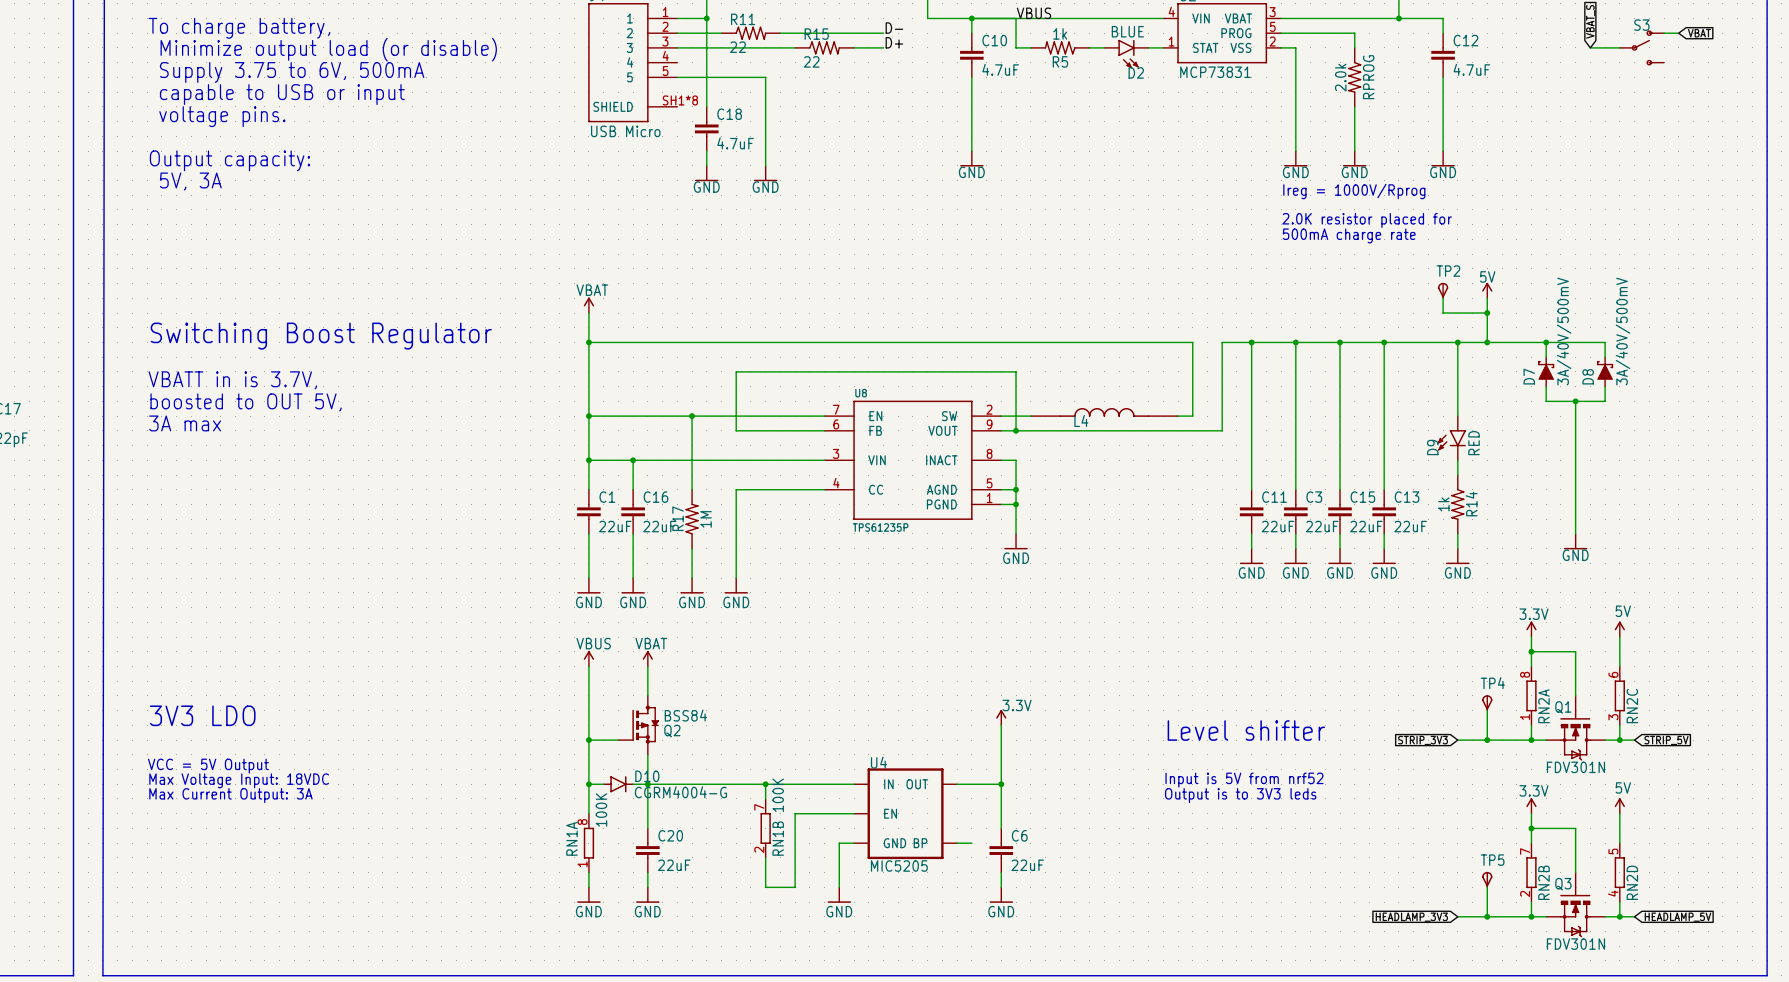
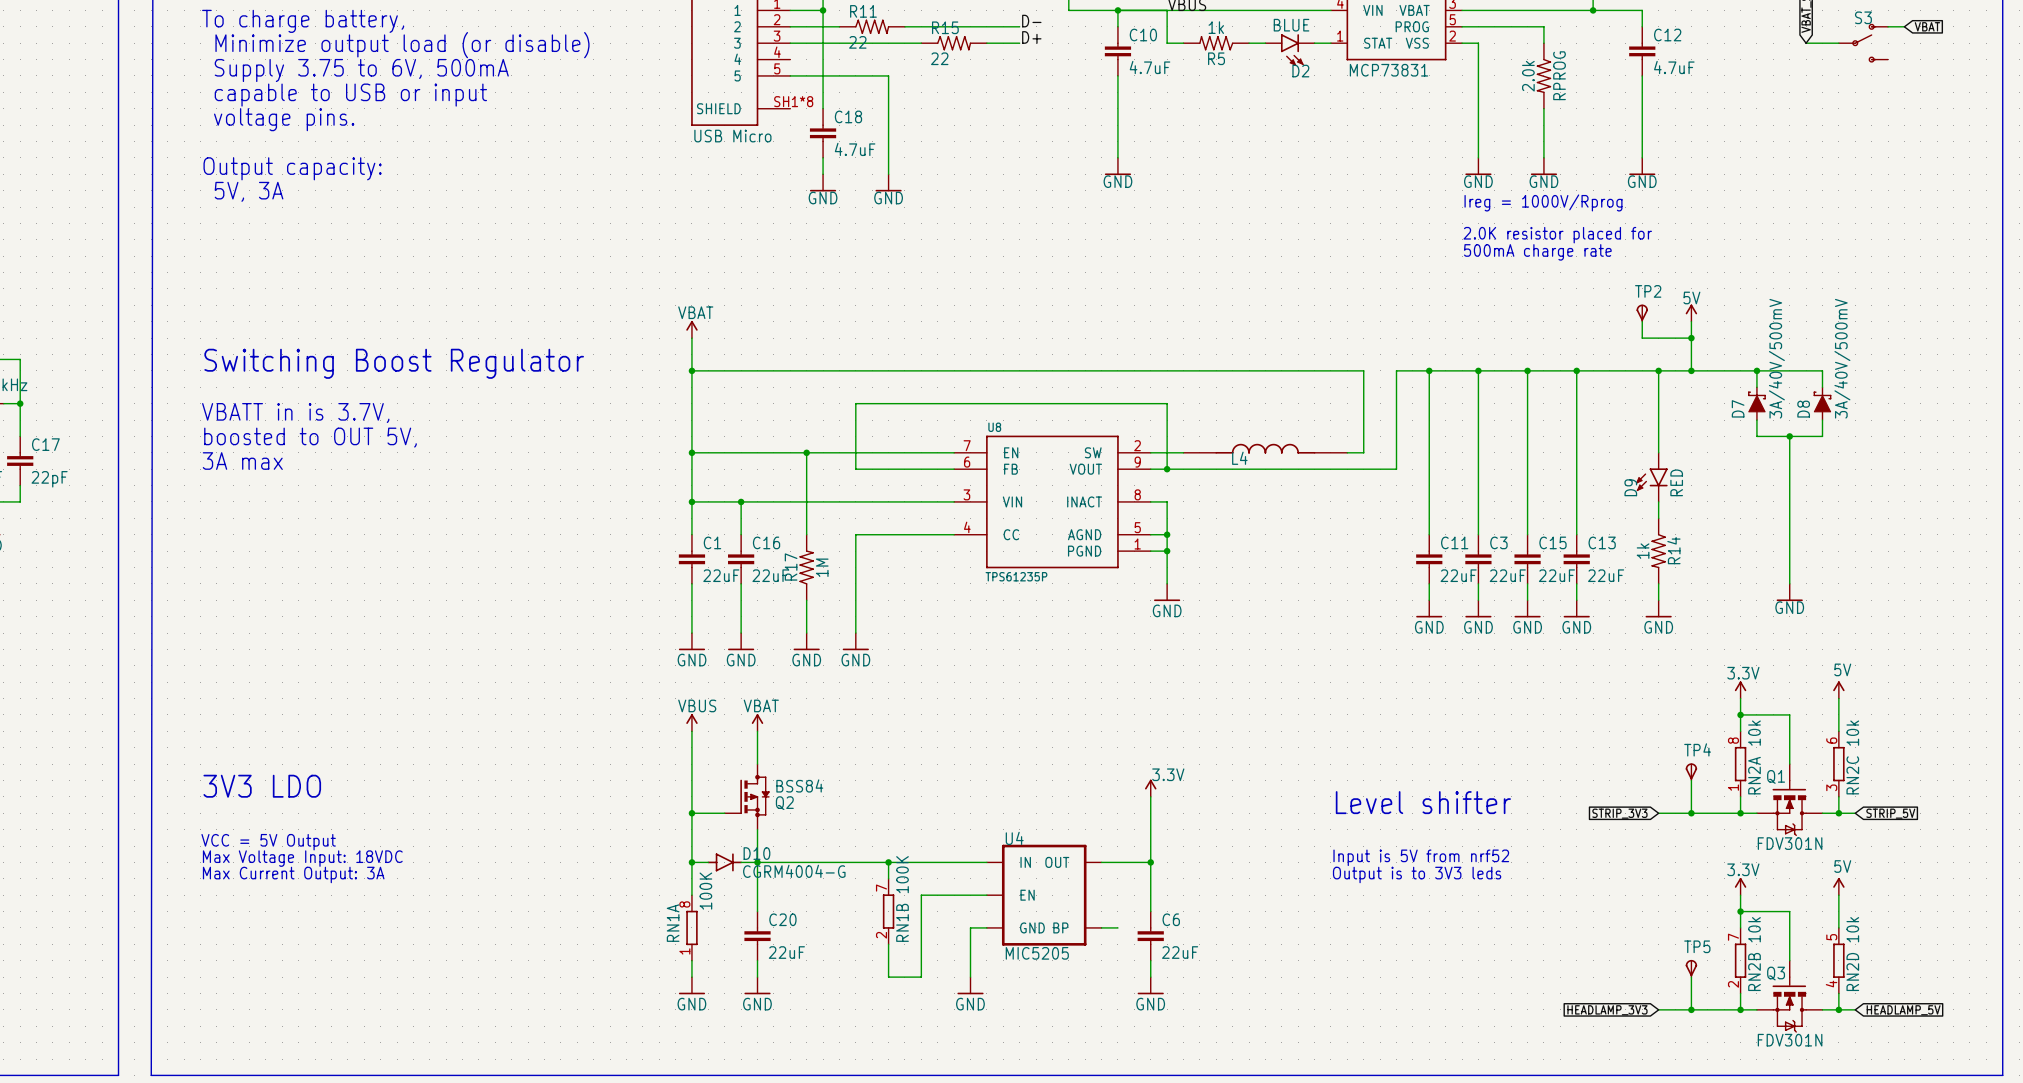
RN2A value: none -> 10k (1754, 733)
RN2C value: none -> 10k (1852, 733)
RN2B value: none -> 10k (1754, 929)
RN2D value: none -> 10k (1852, 929)

